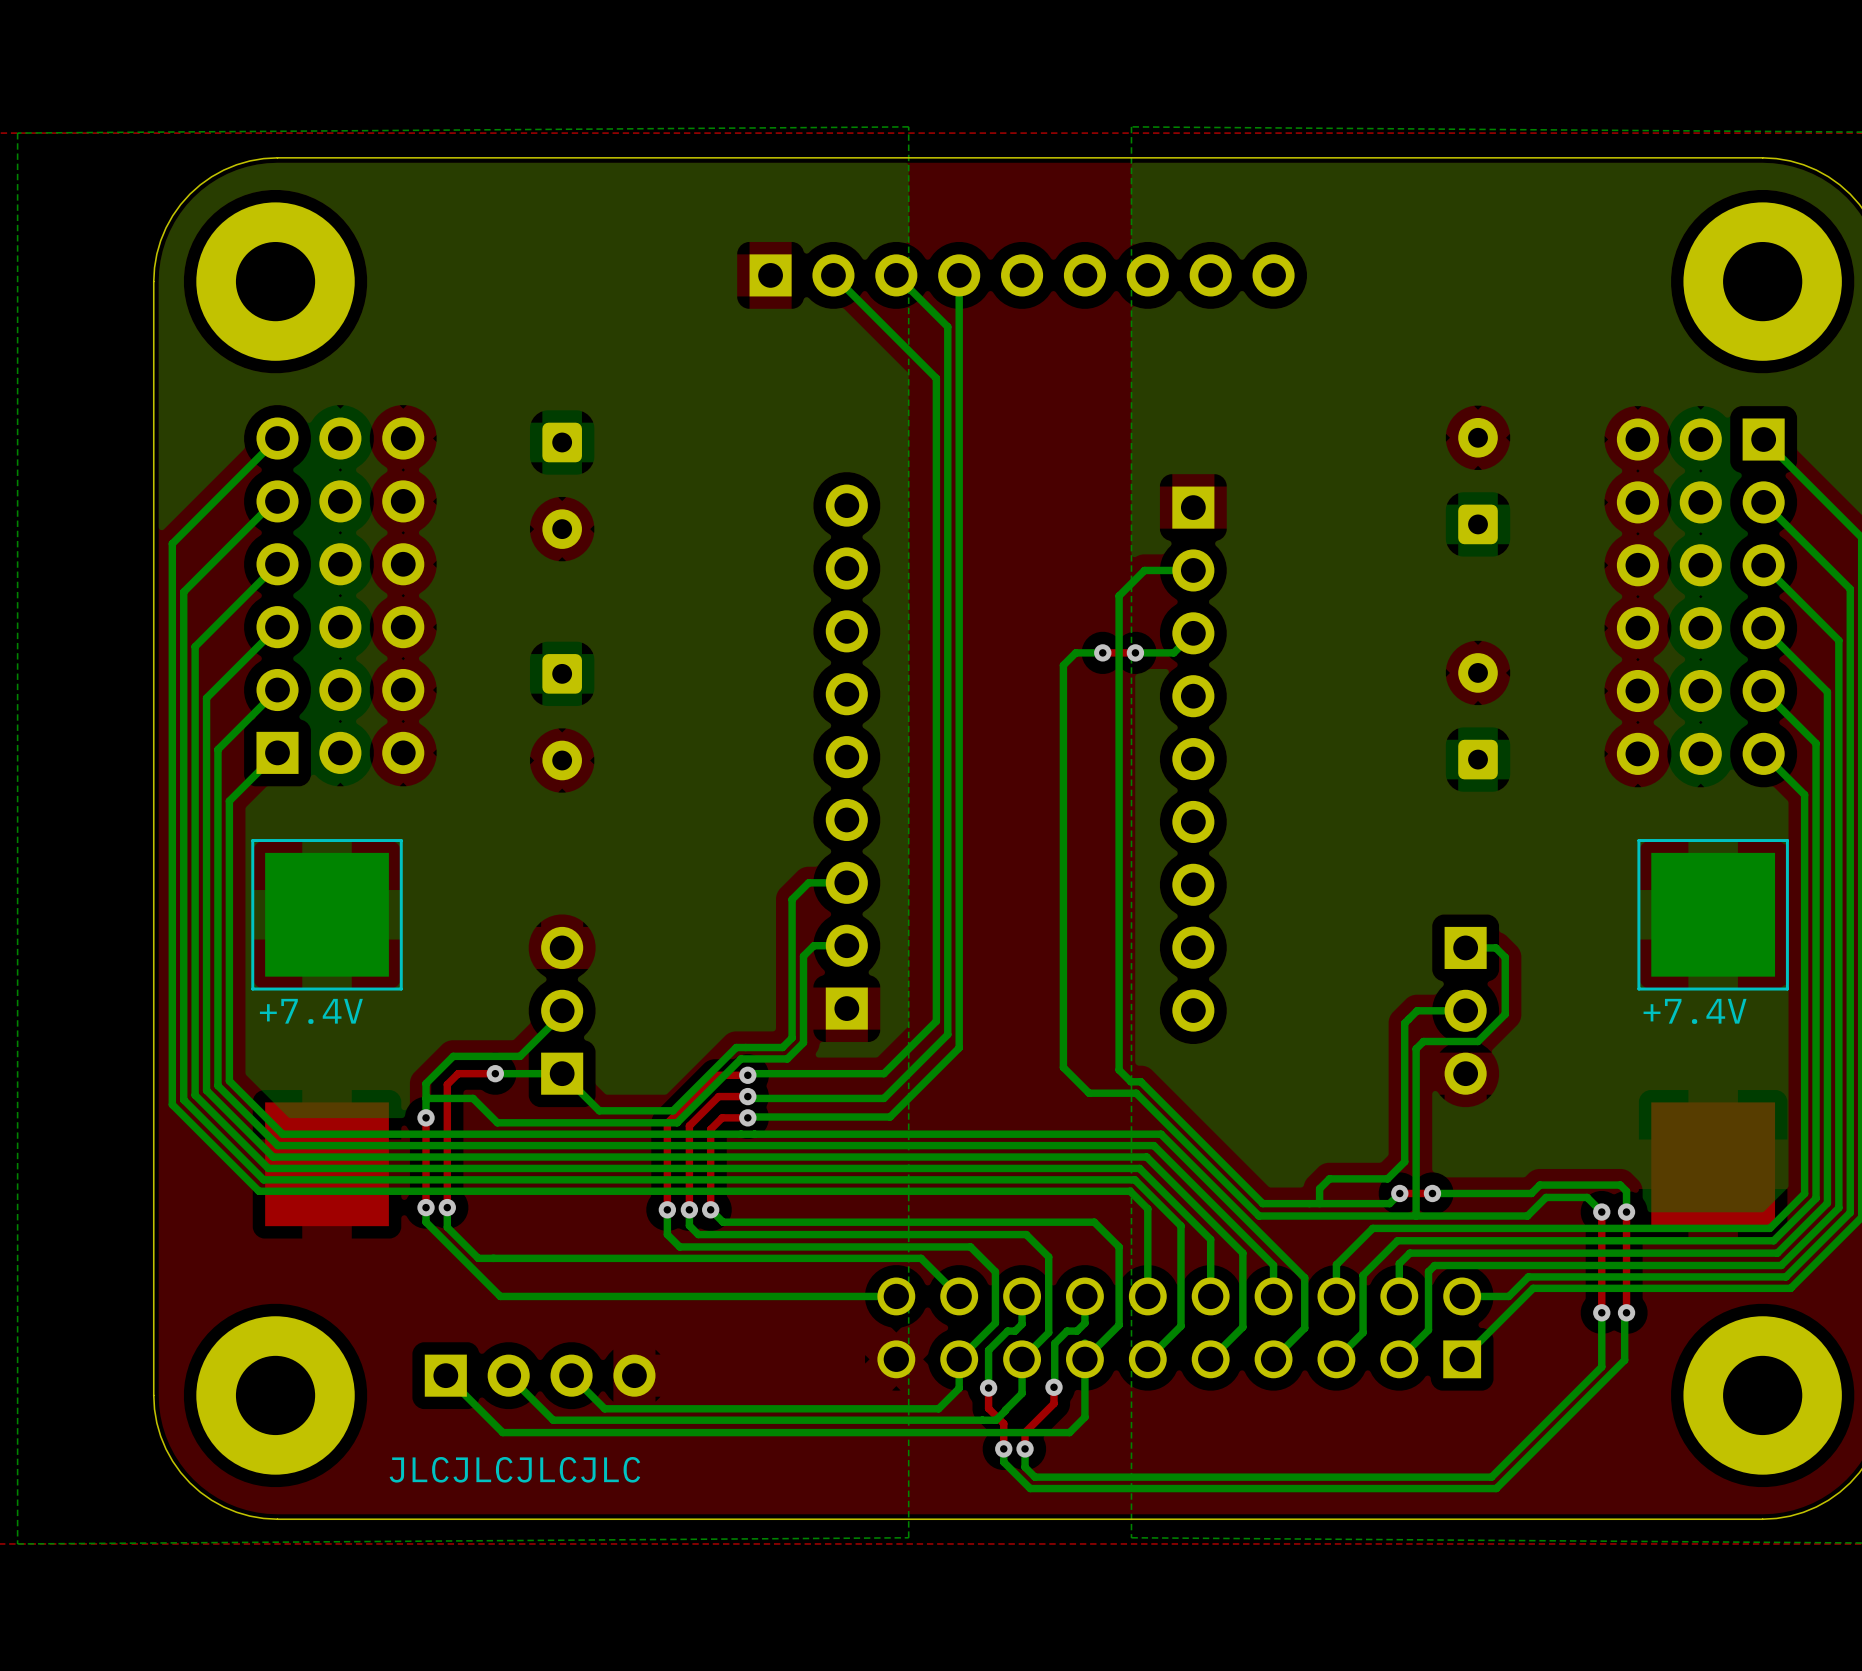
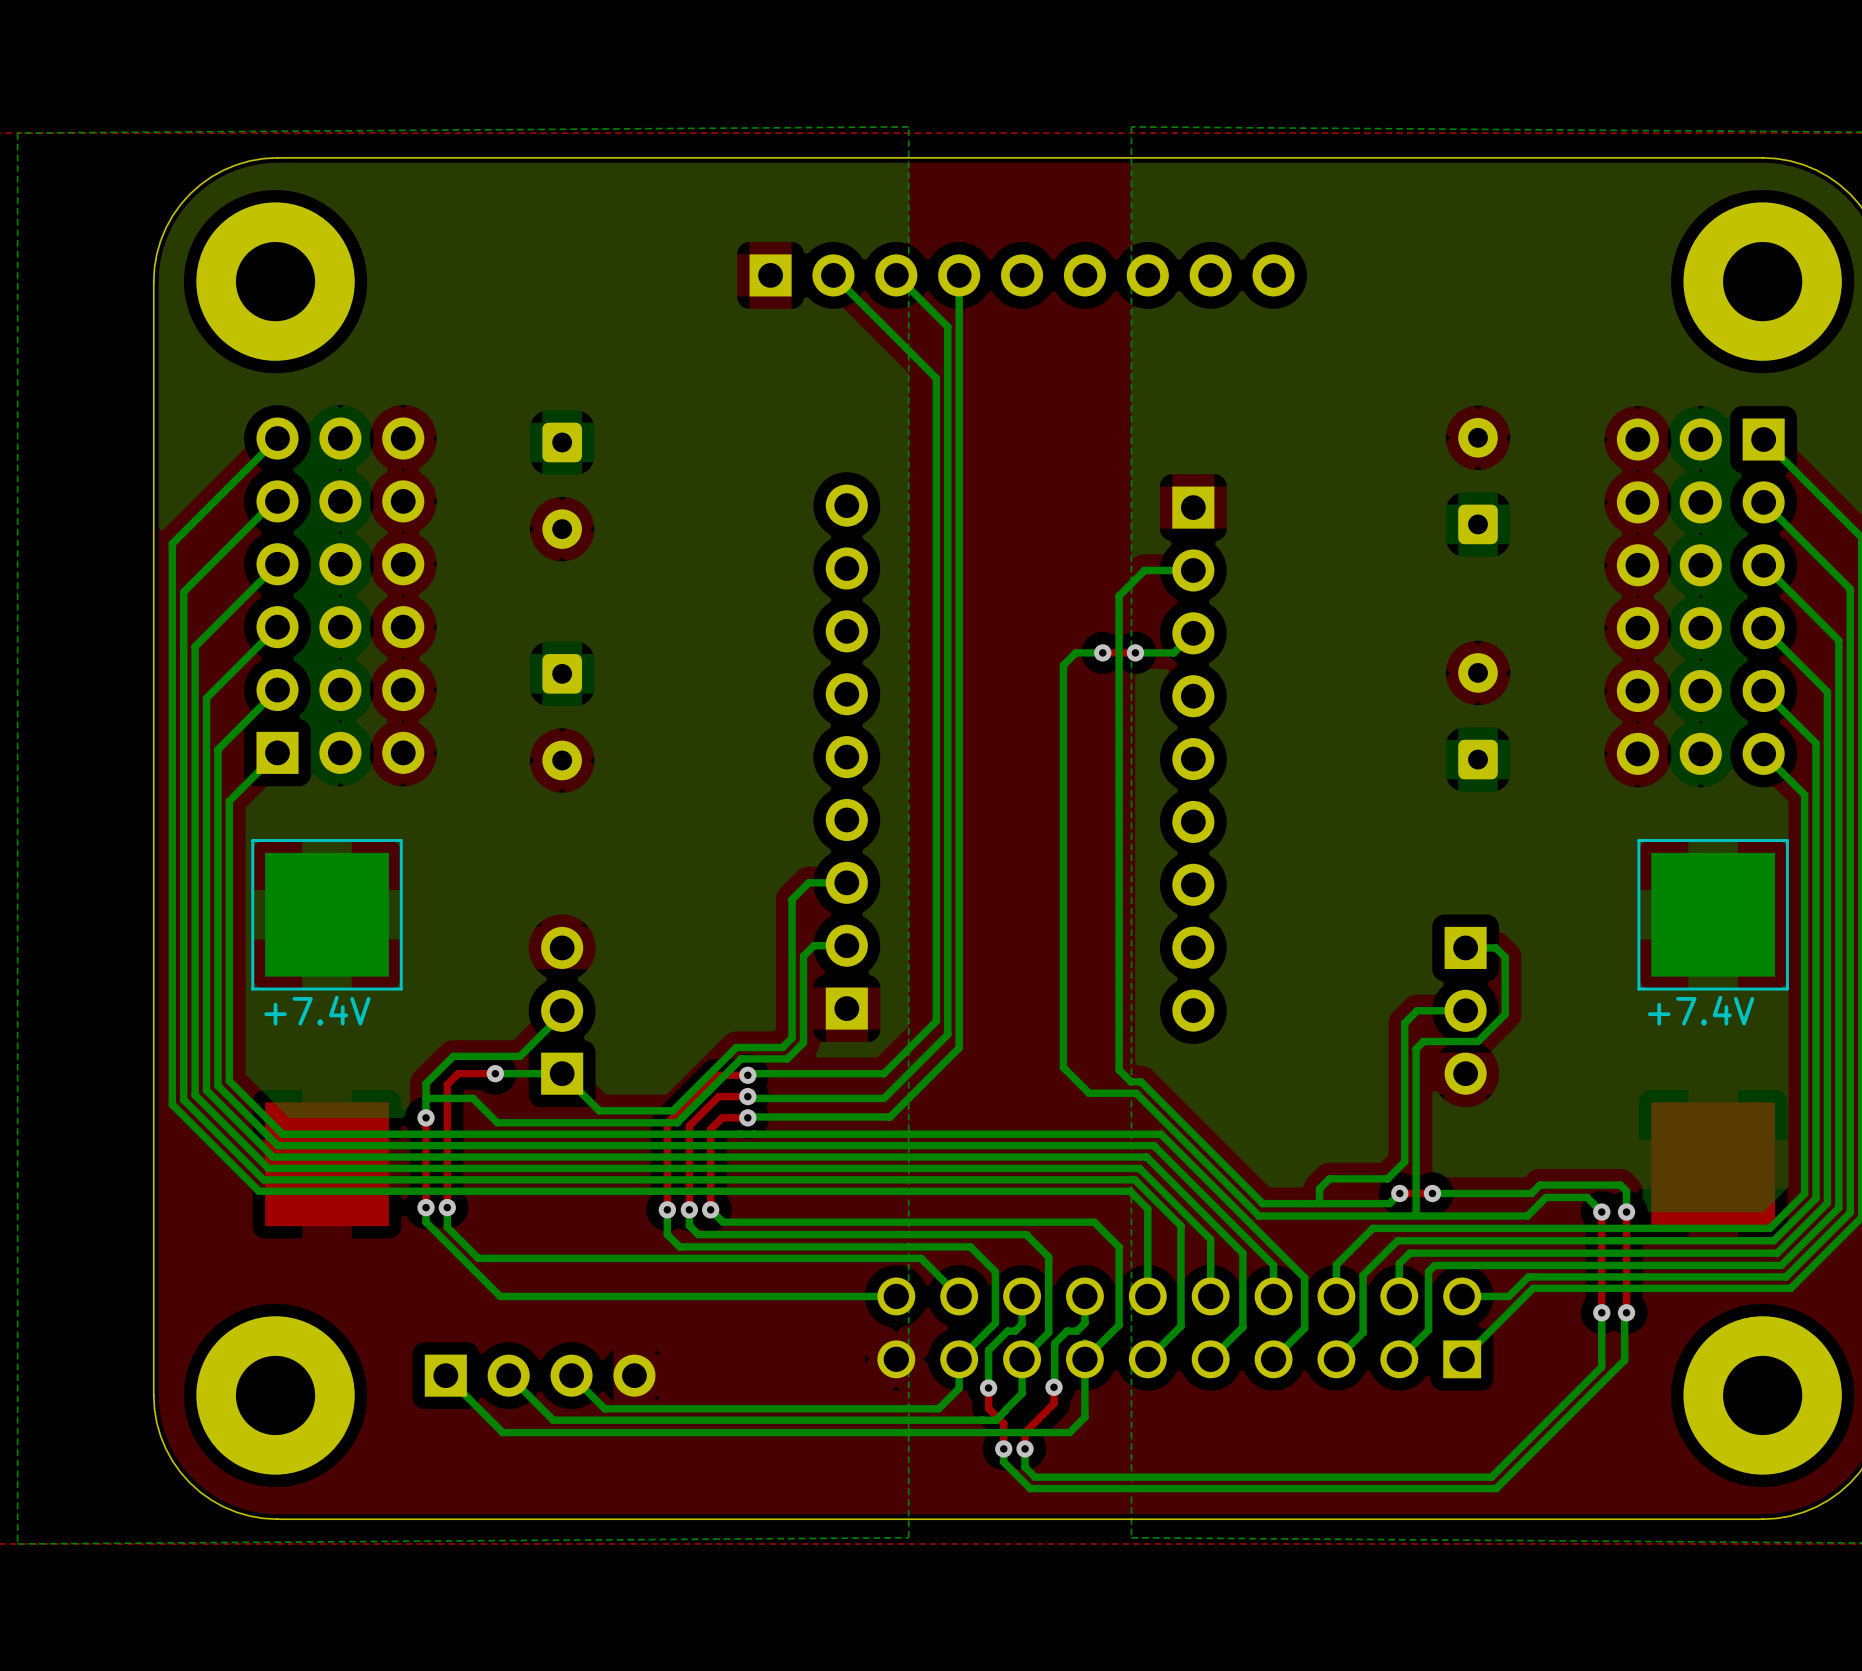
text: JLCJLCJLCJLC (514, 1469) -> none

